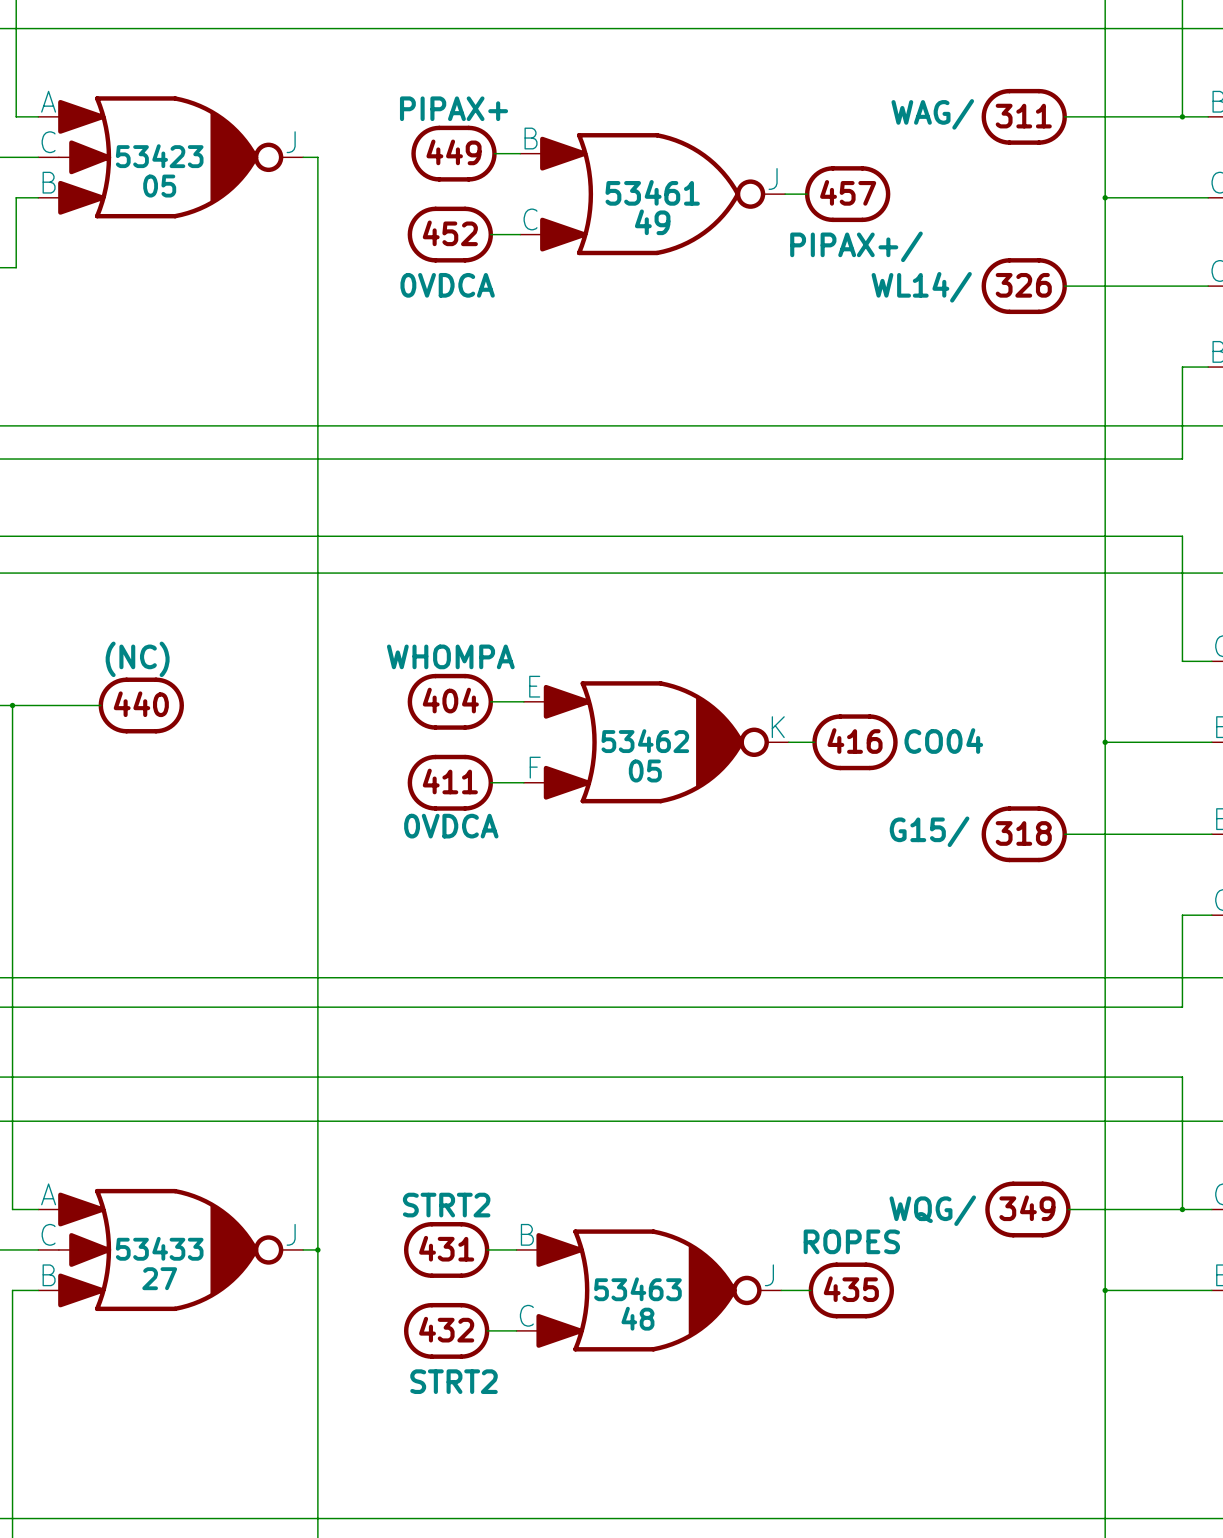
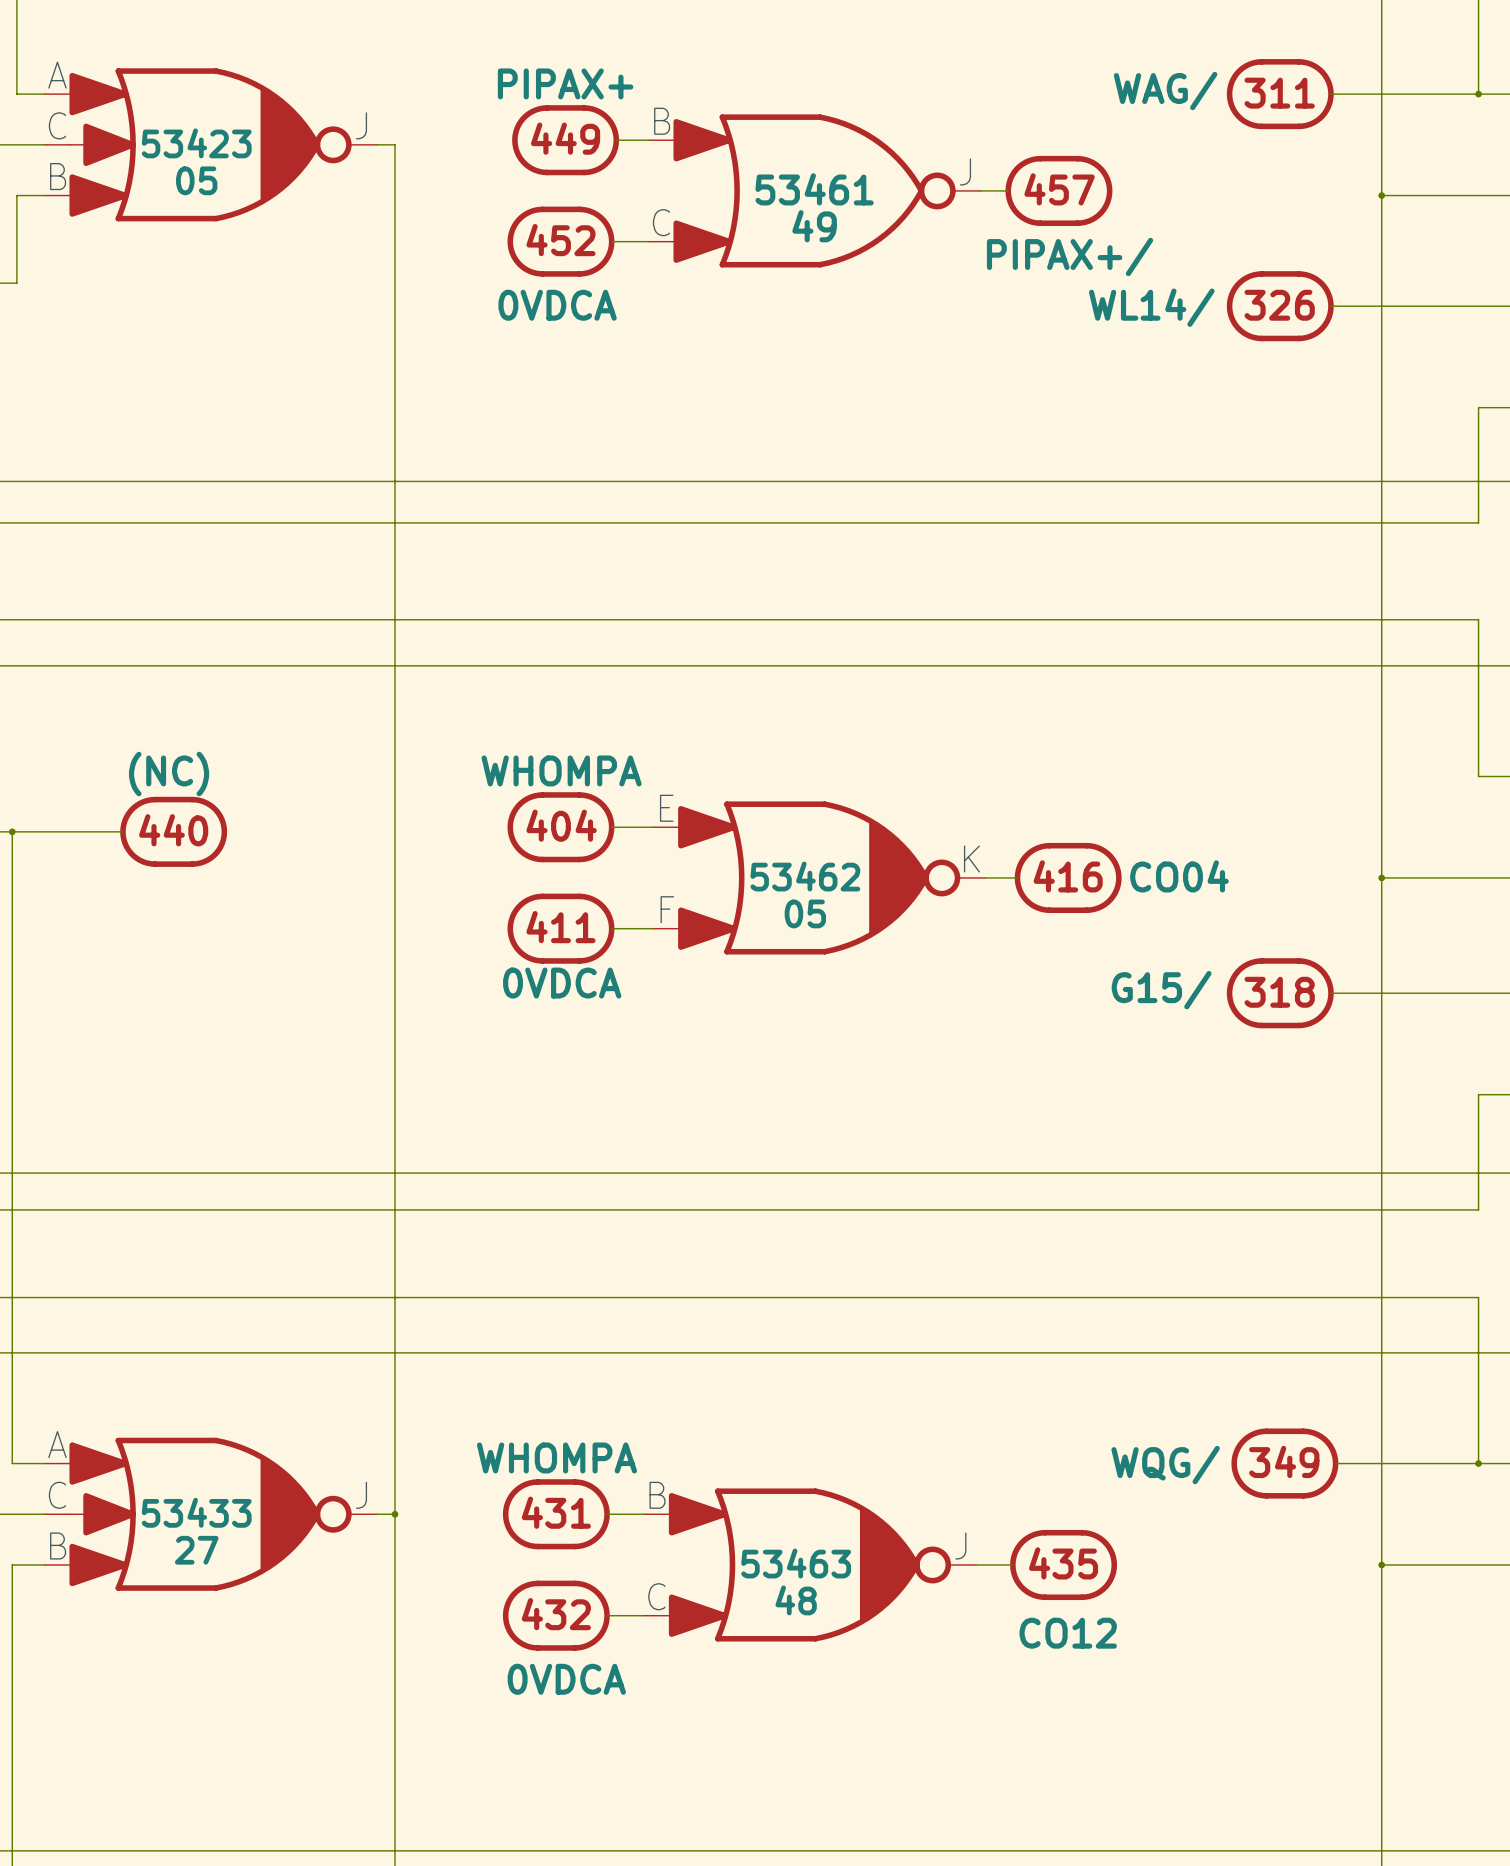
part text: STRT2 (446, 1205) -> WHOMPA (556, 1457)
part text: ROPES (851, 1241) -> CO12 (1068, 1633)
part text: STRT2 (454, 1381) -> 0VDCA (566, 1679)

